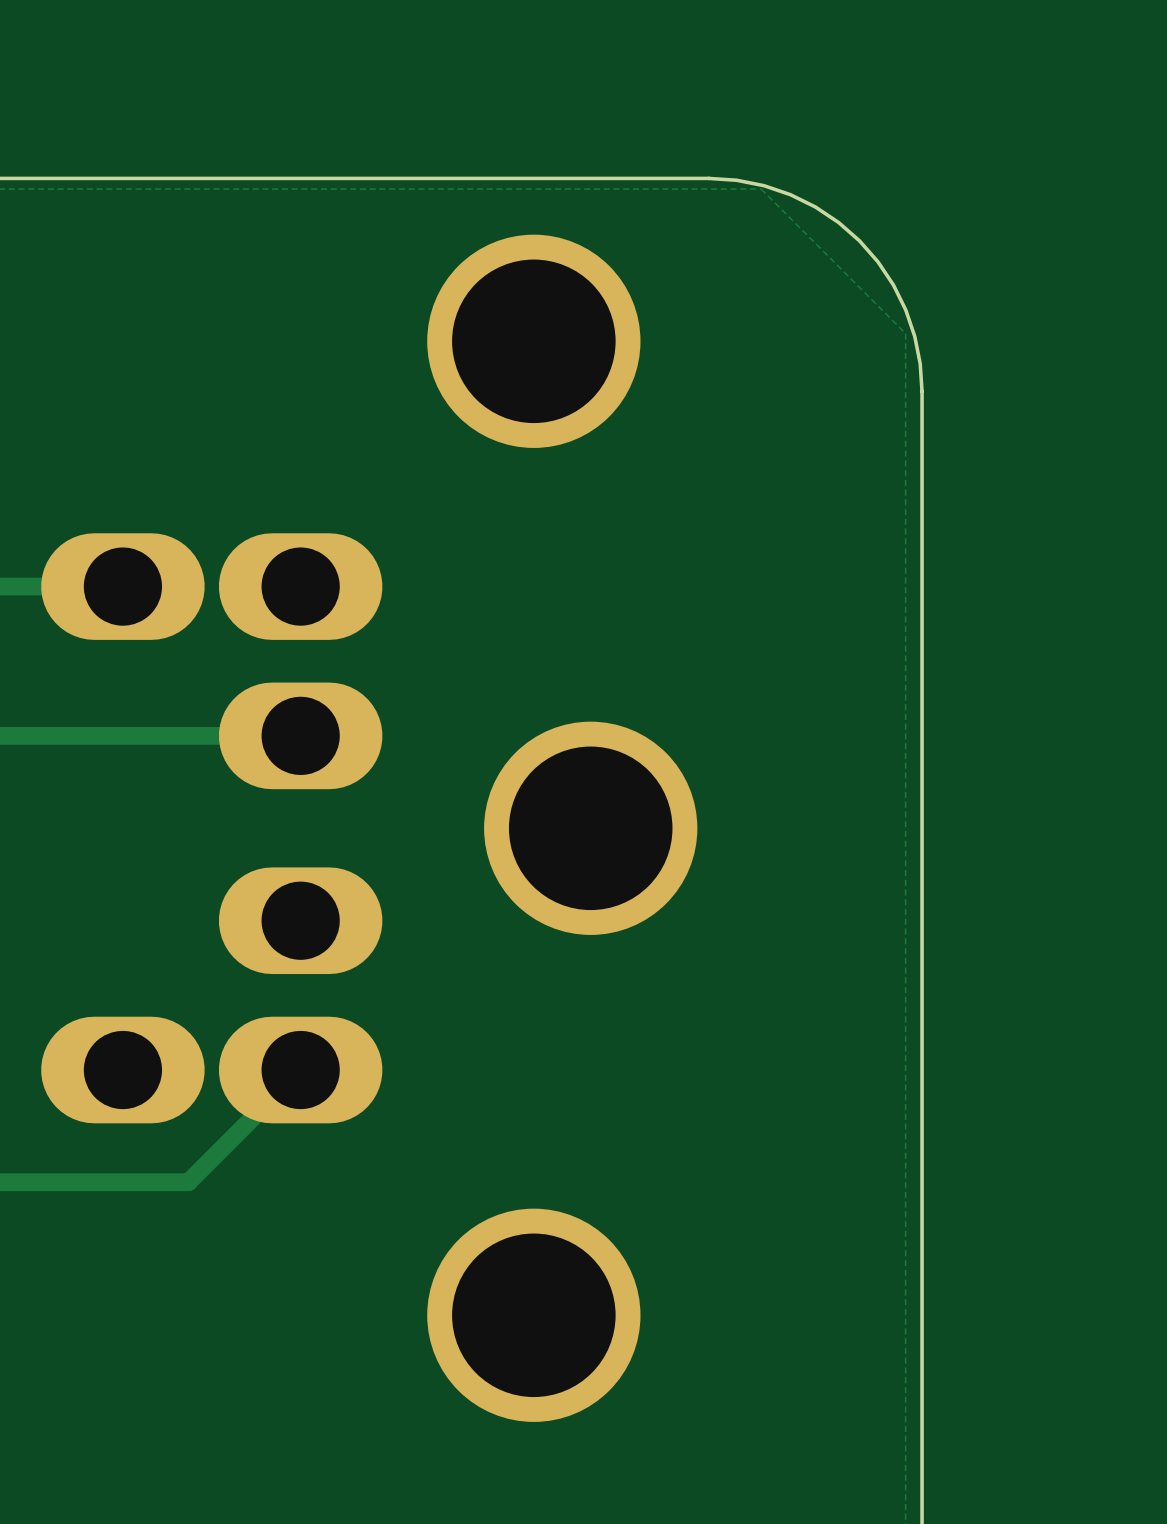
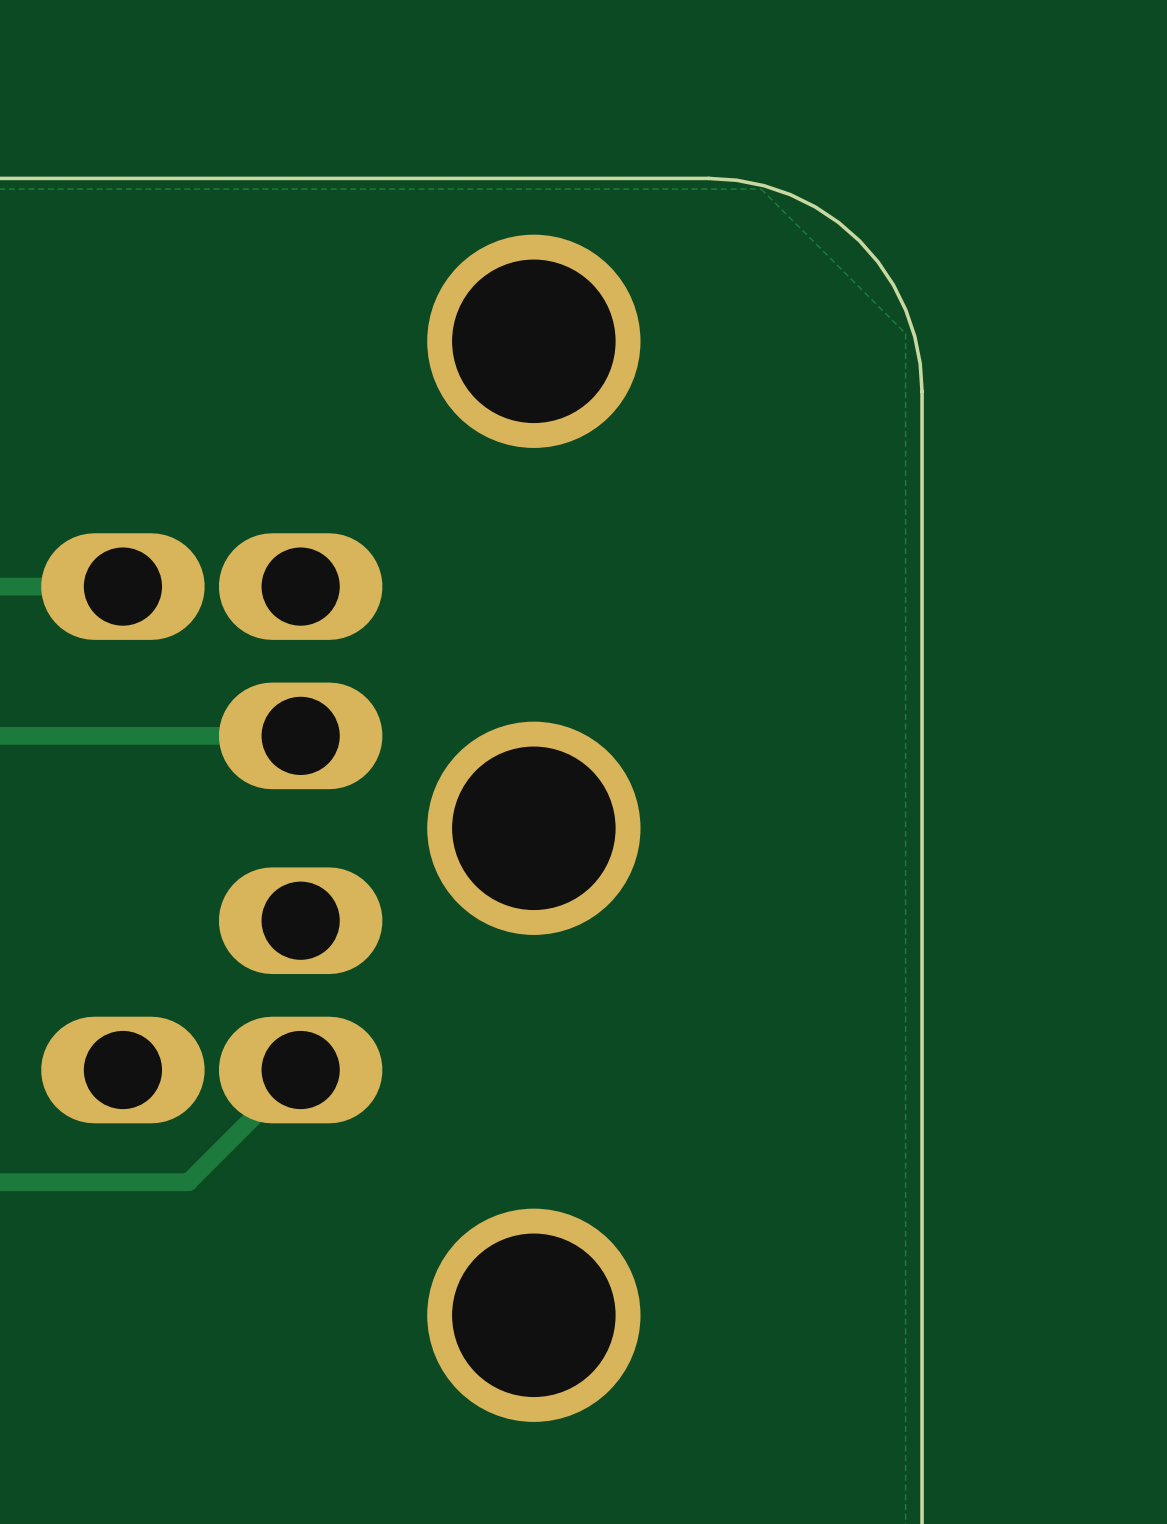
part footprint: [41, 234, 698, 1422] -> [41, 234, 641, 1422]

